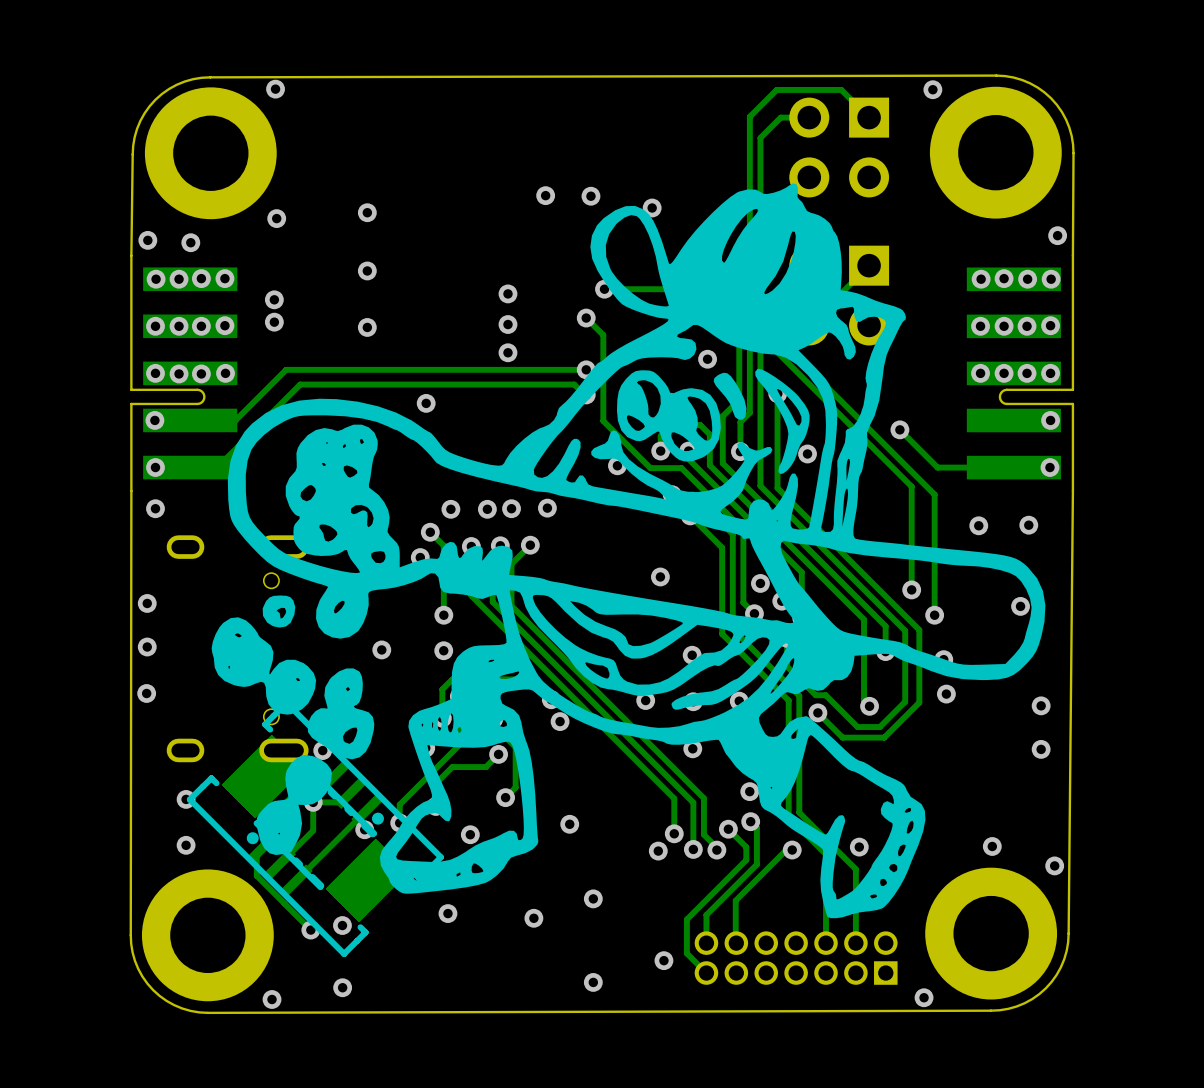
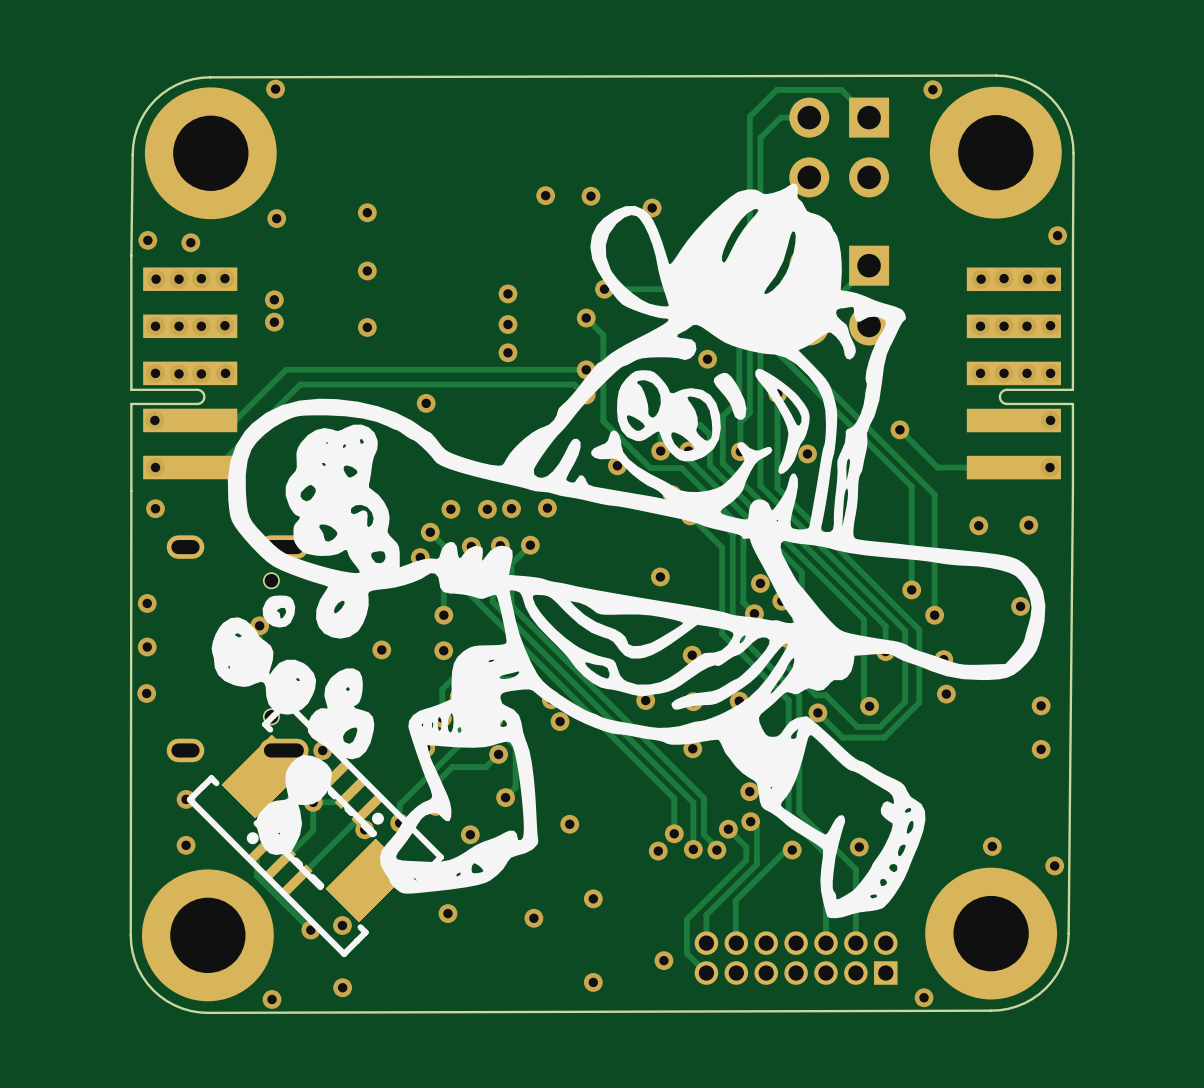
via: none -> (259, 625)

